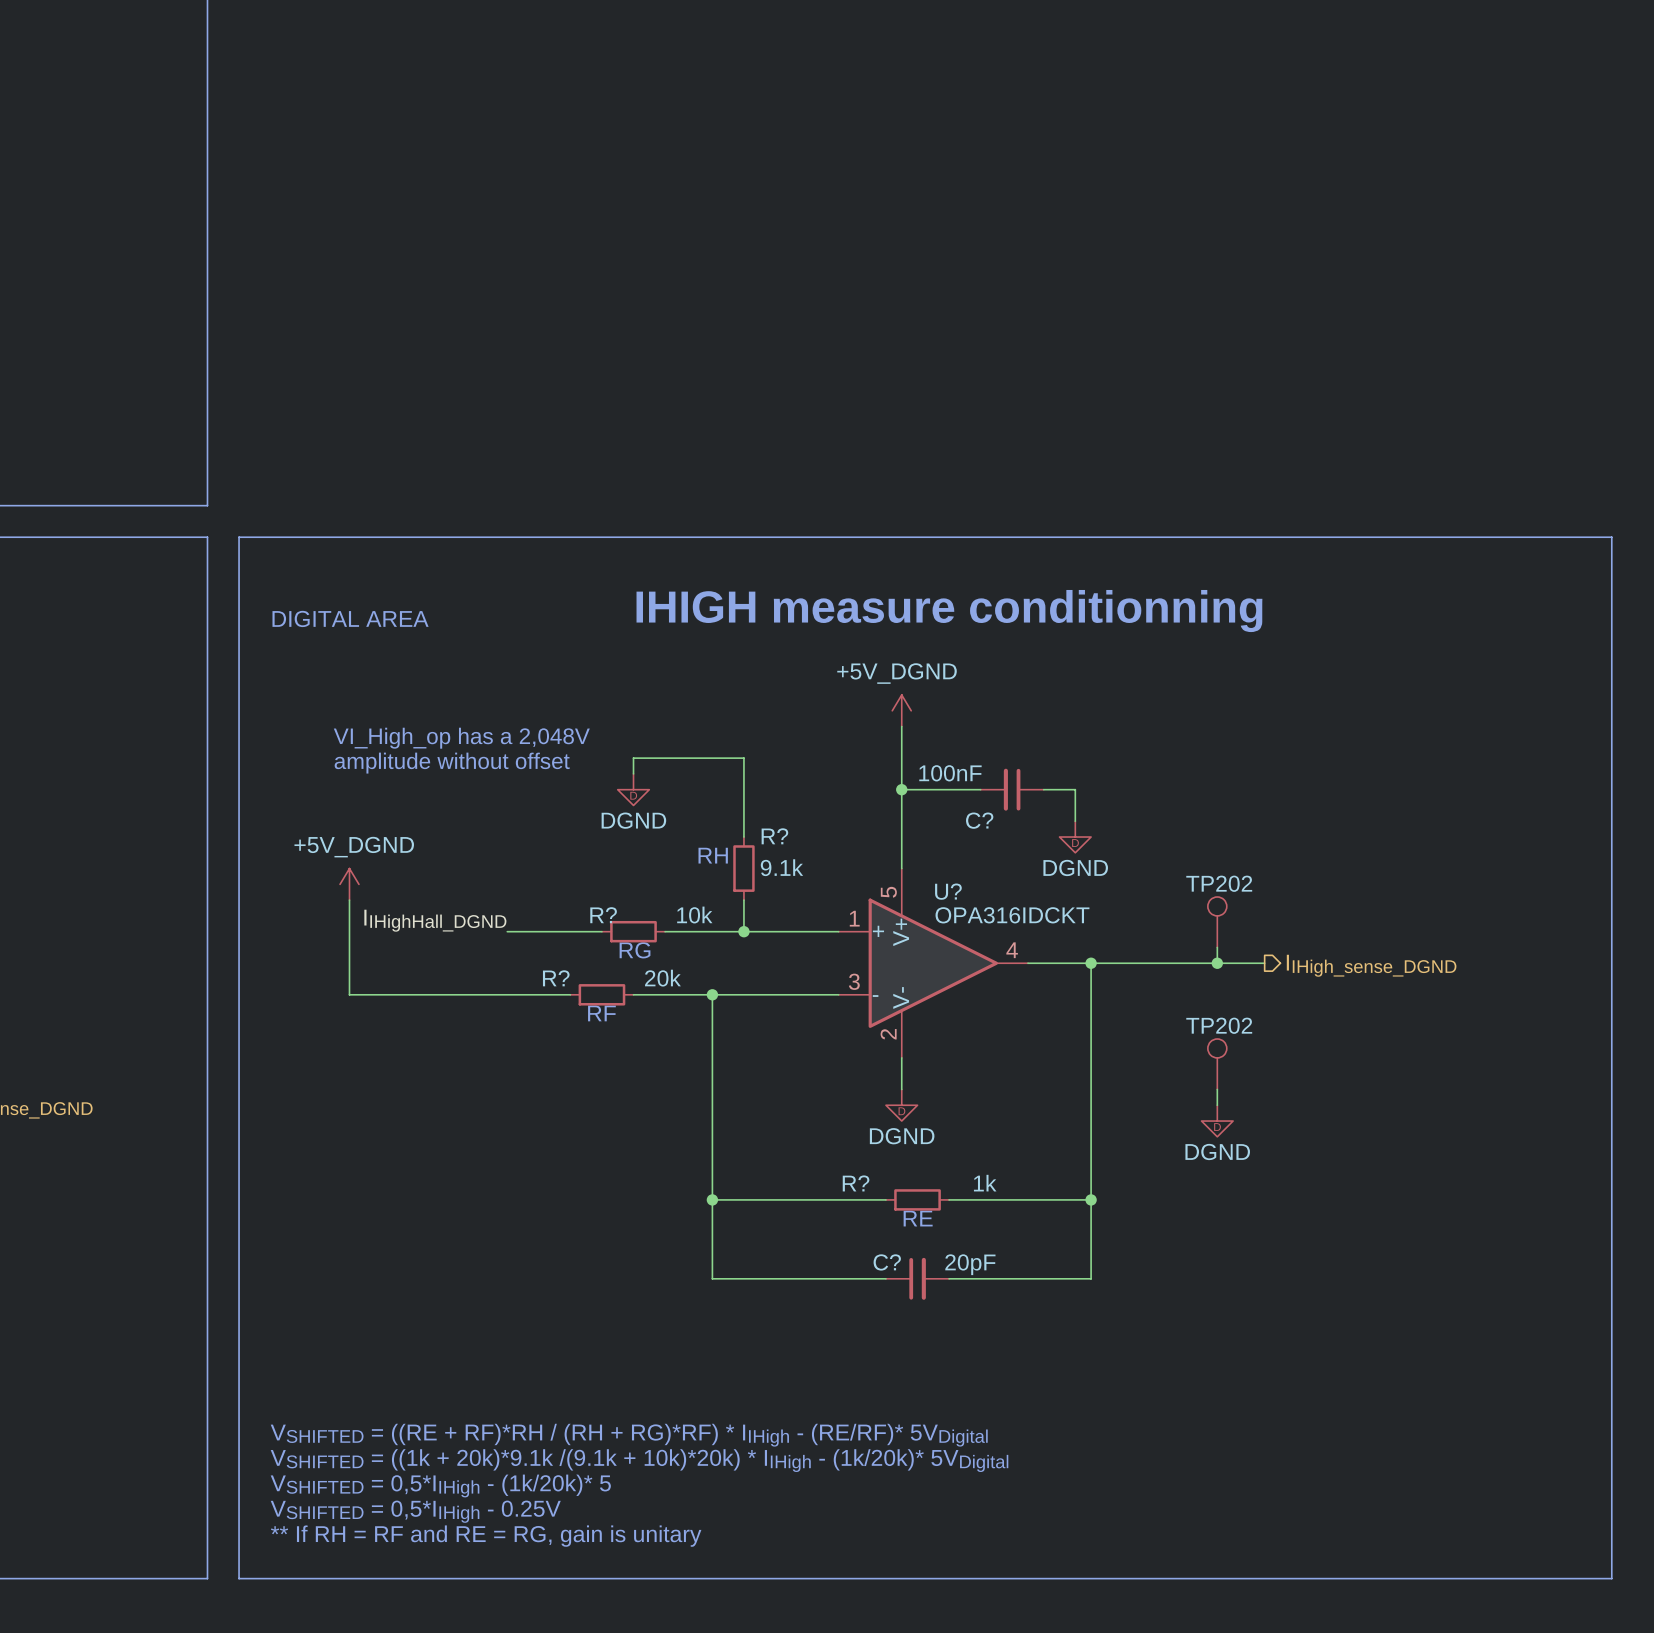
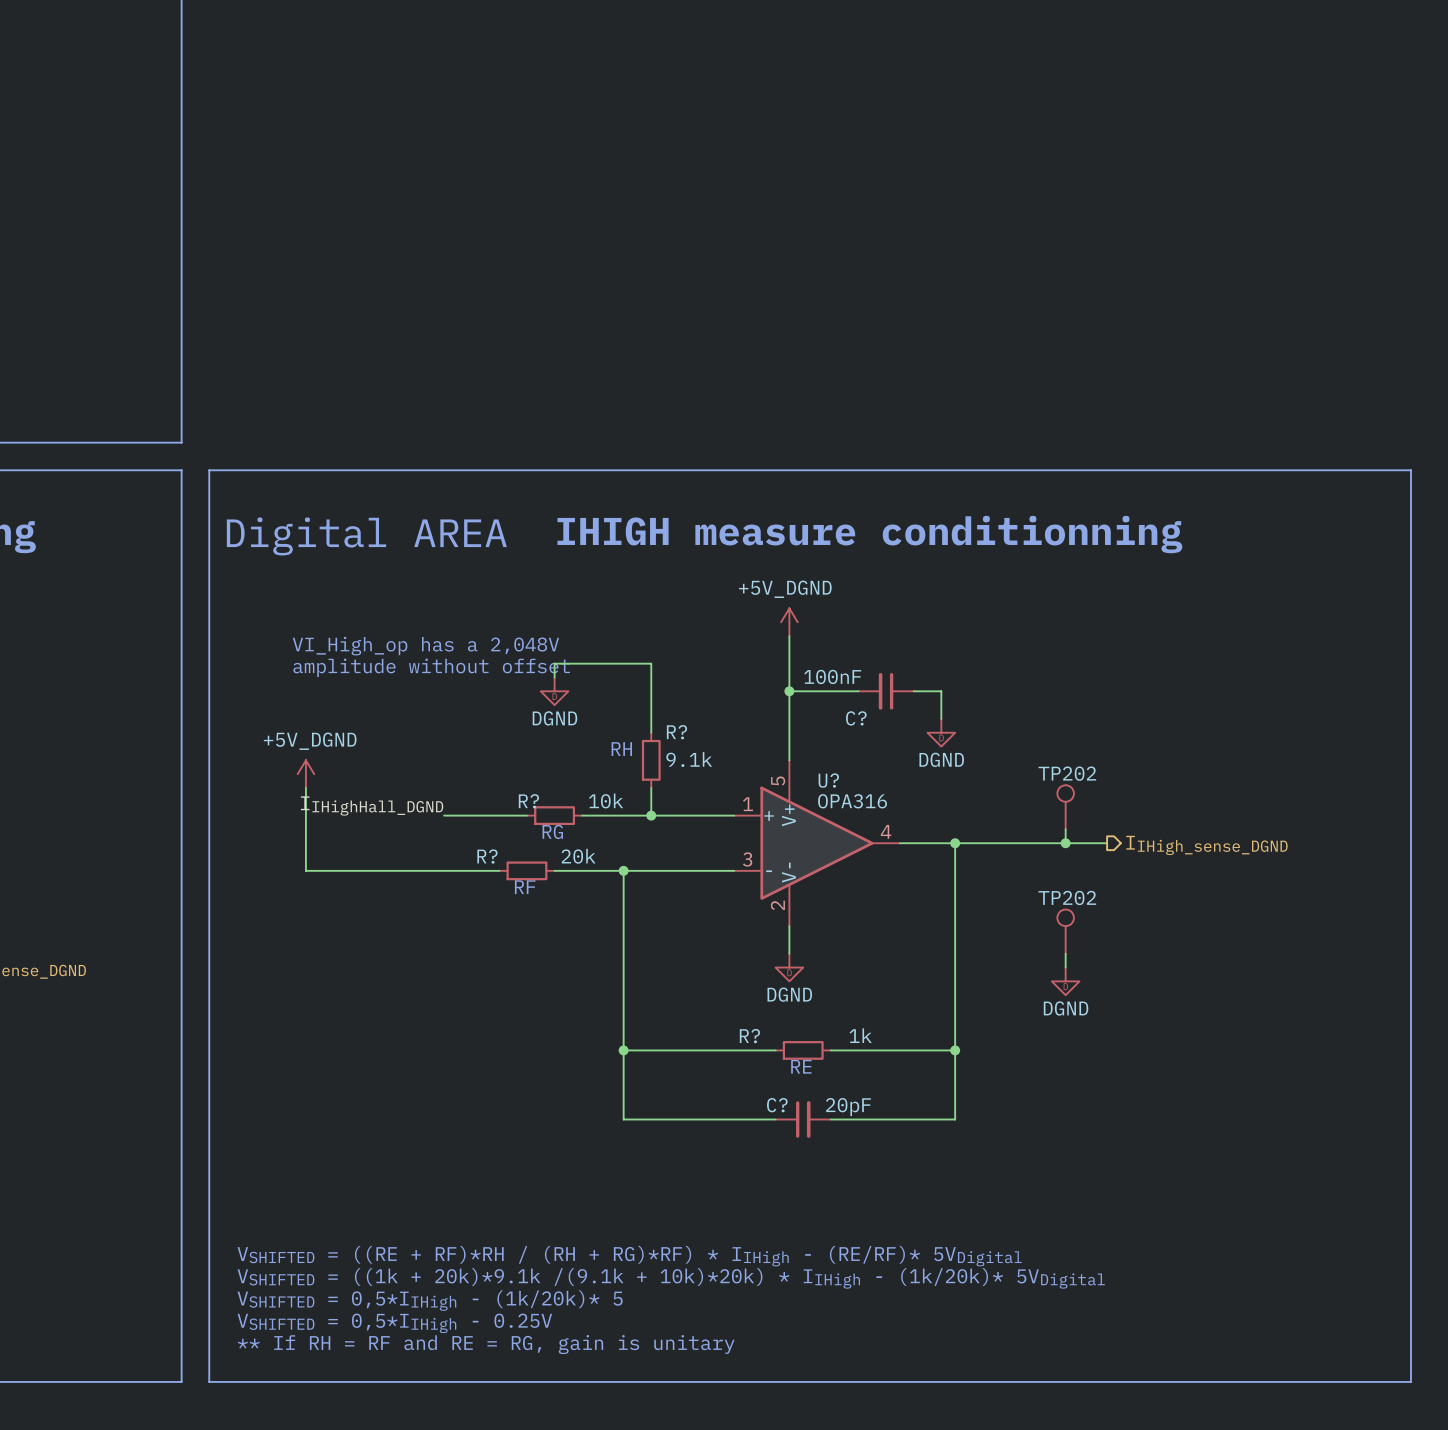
text: none -> Digital AREA (366, 536)
text: DIGITAL AREA (350, 618) -> none
U? value: none -> OPA316 (852, 801)
U? text: OPA316IDCKT (1012, 915) -> none

